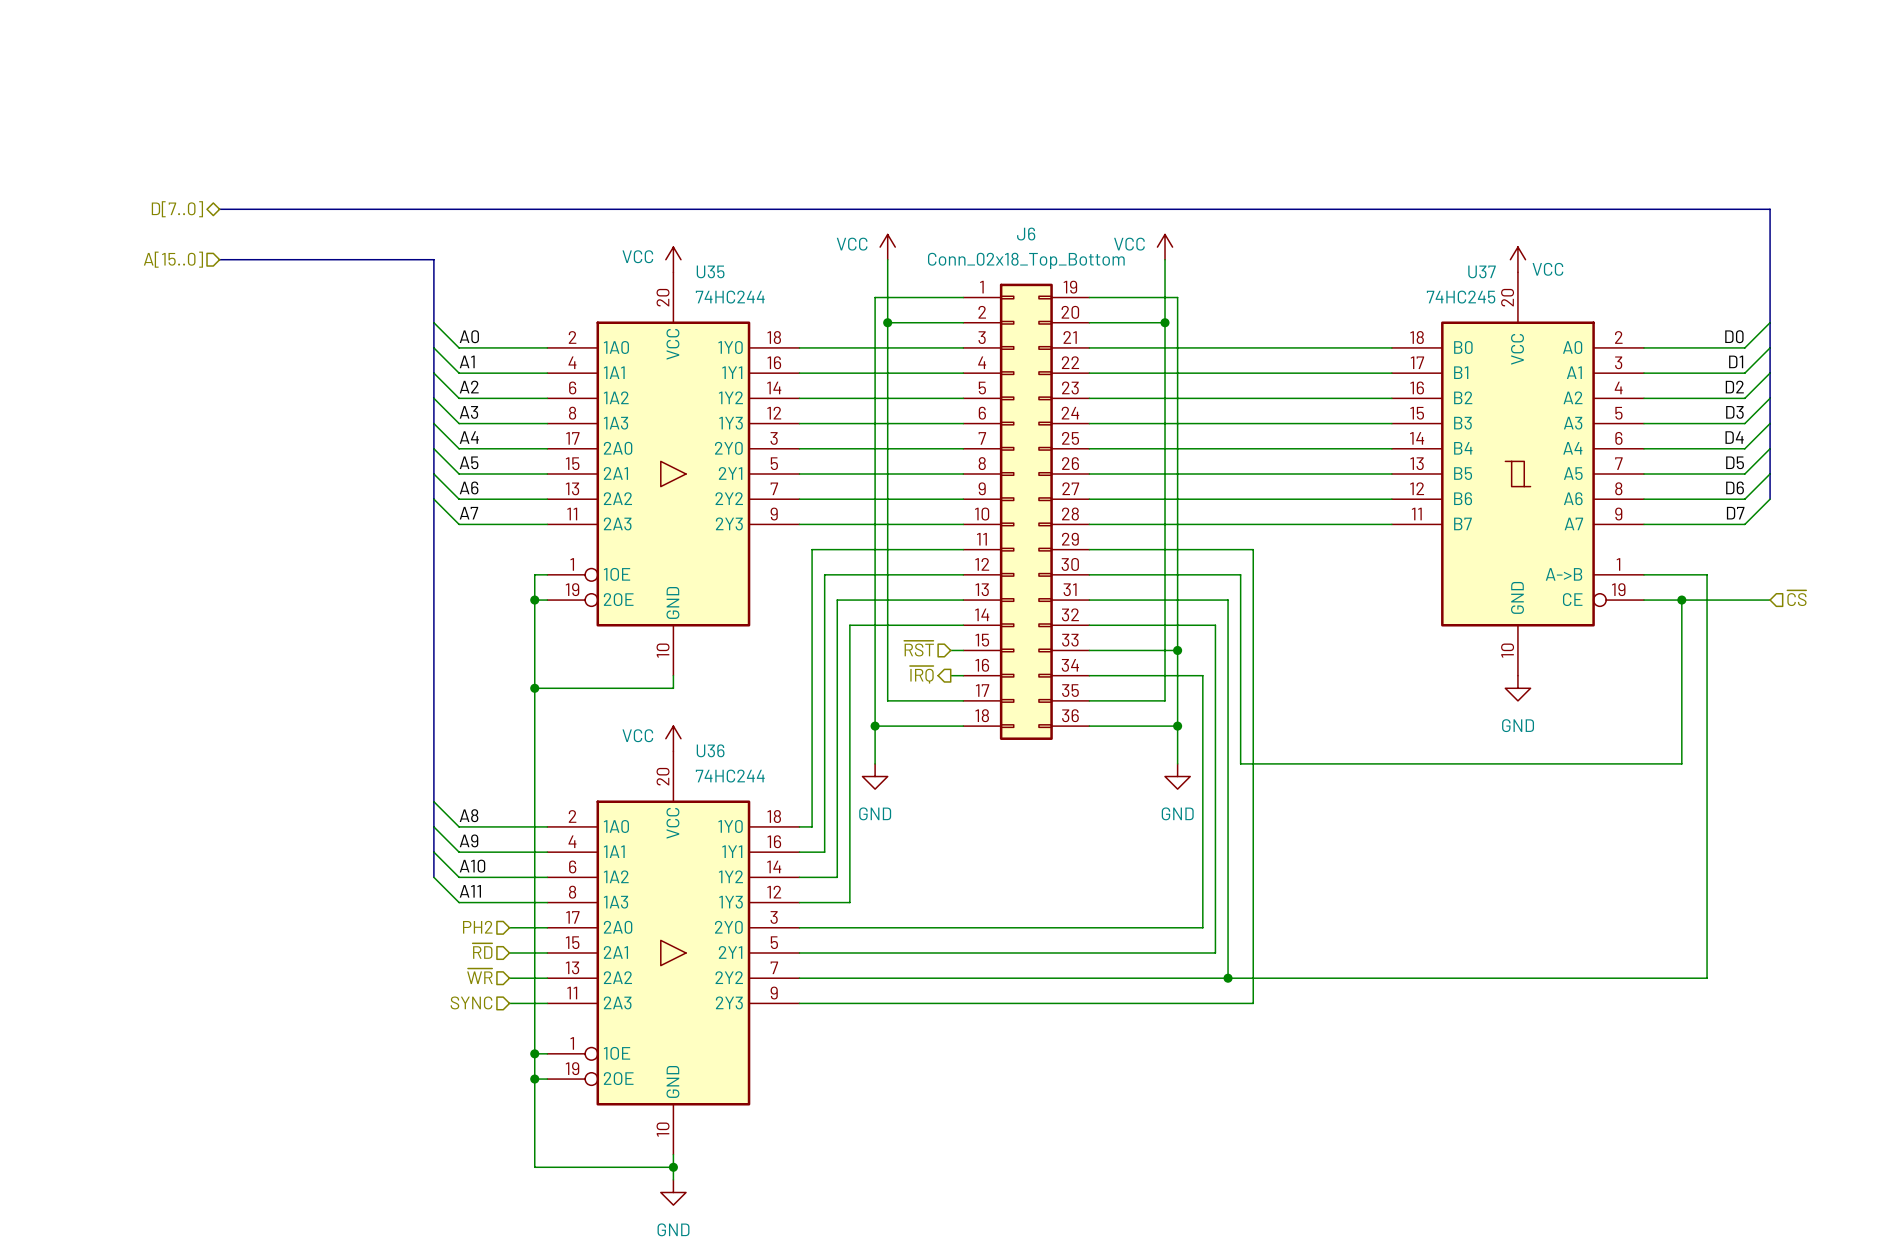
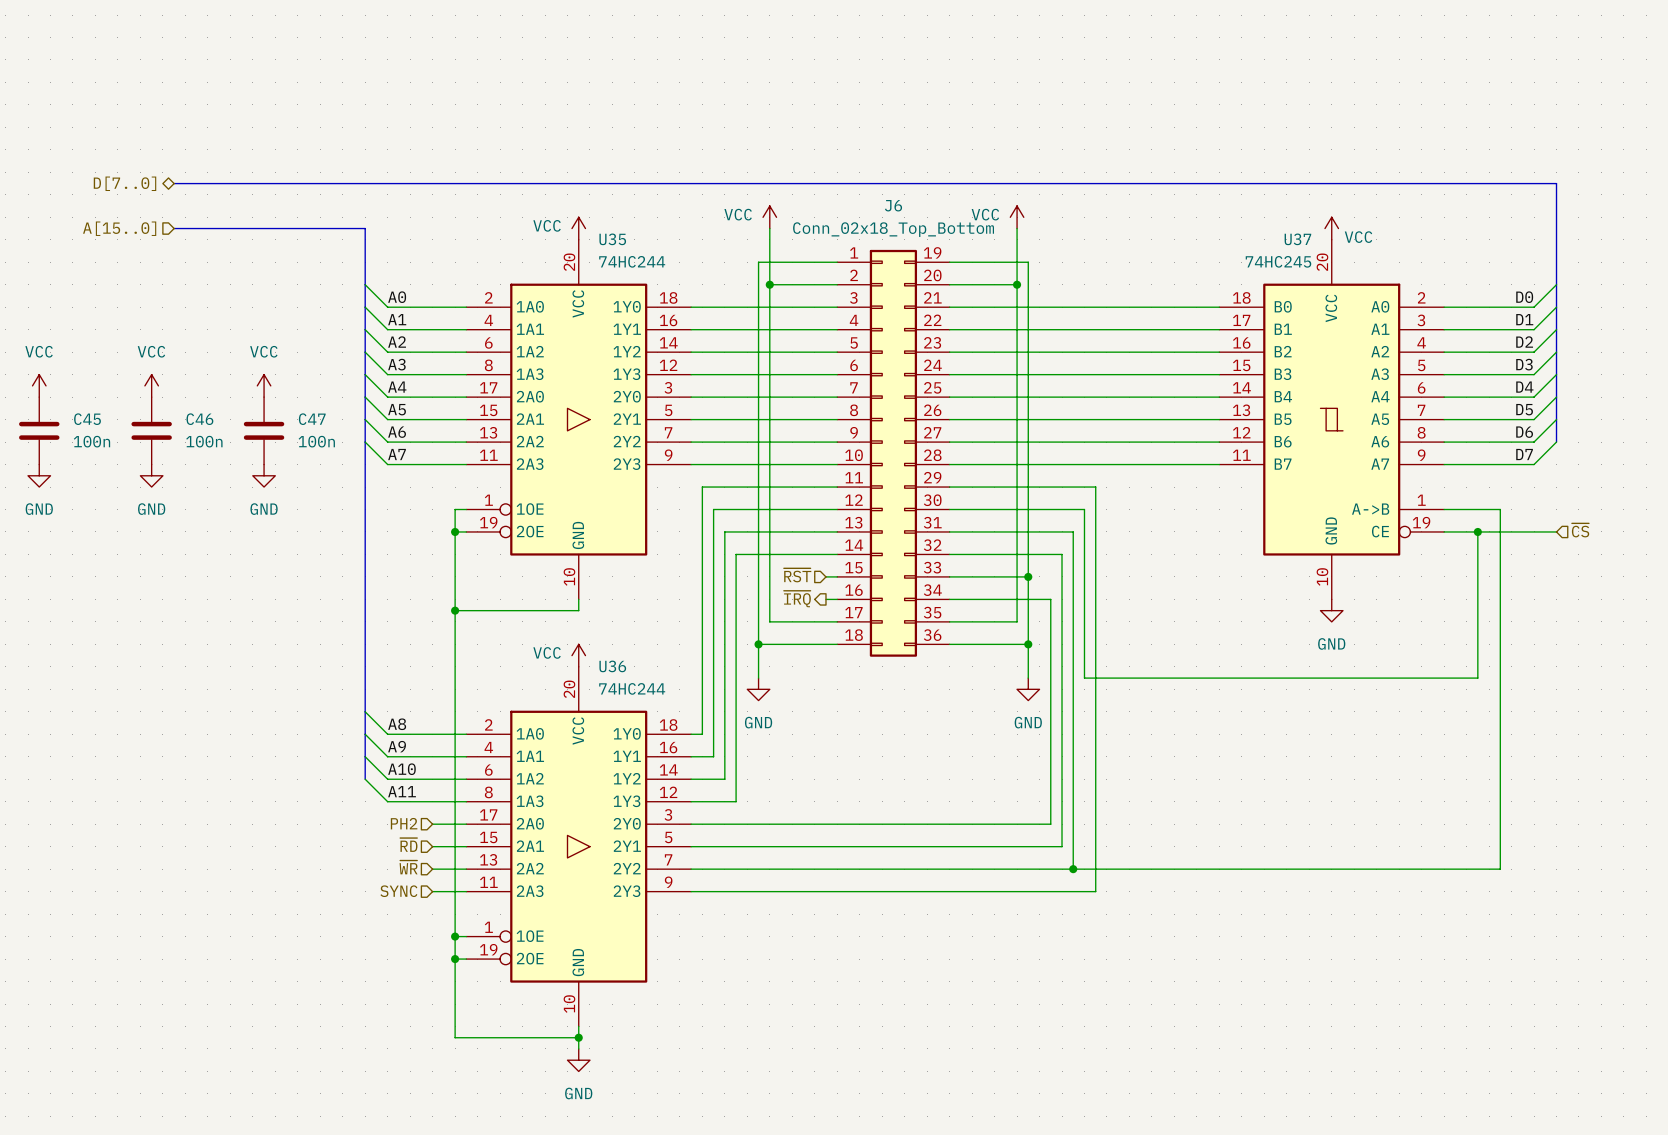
power symbol: none -> VCC (39, 385)
power symbol: none -> VCC (151, 385)
power symbol: none -> VCC (264, 385)
C45: none -> 100n (39, 430)
C46: none -> 100n (151, 430)
C47: none -> 100n (264, 430)
power symbol: none -> GND (39, 475)
power symbol: none -> GND (151, 475)
power symbol: none -> GND (264, 475)

